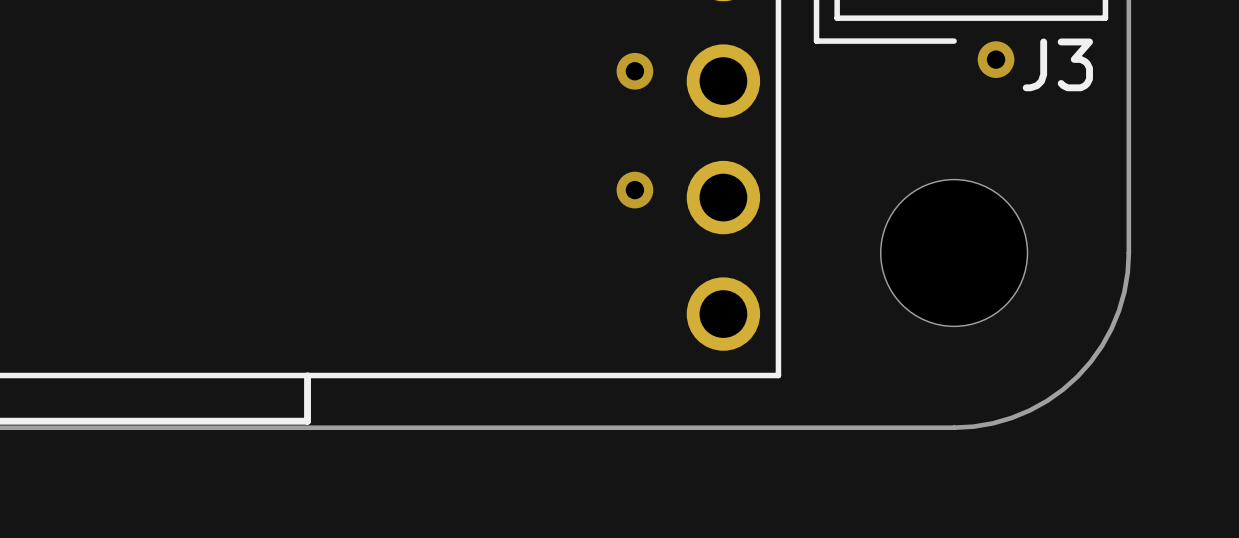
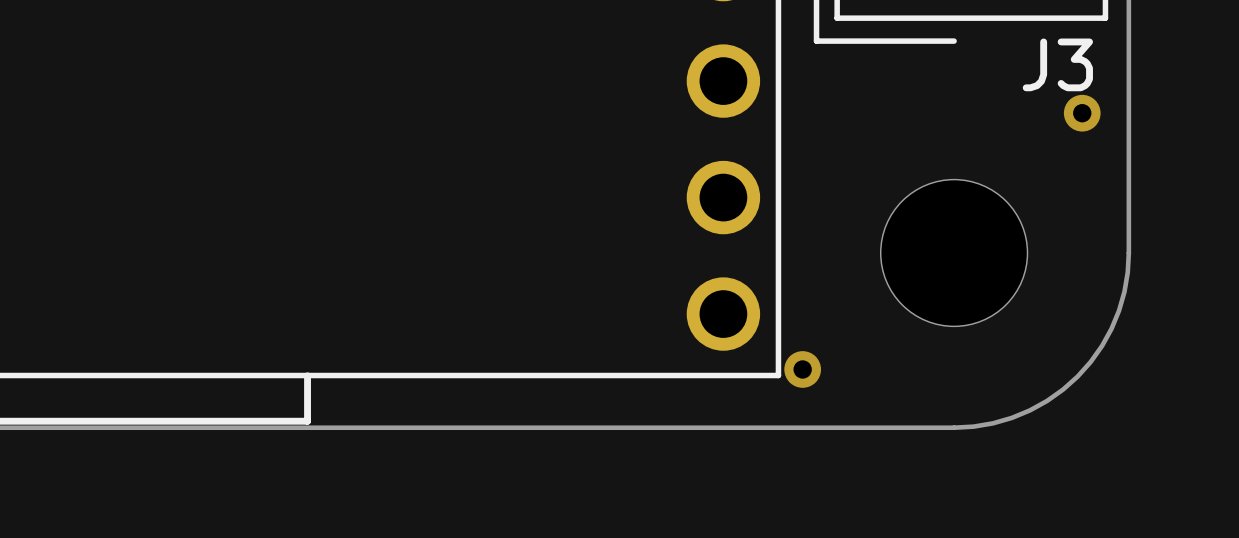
via position: (996, 59) -> (1082, 113)
via: (634, 71) -> none
via: (634, 190) -> none
via: none -> (802, 369)

